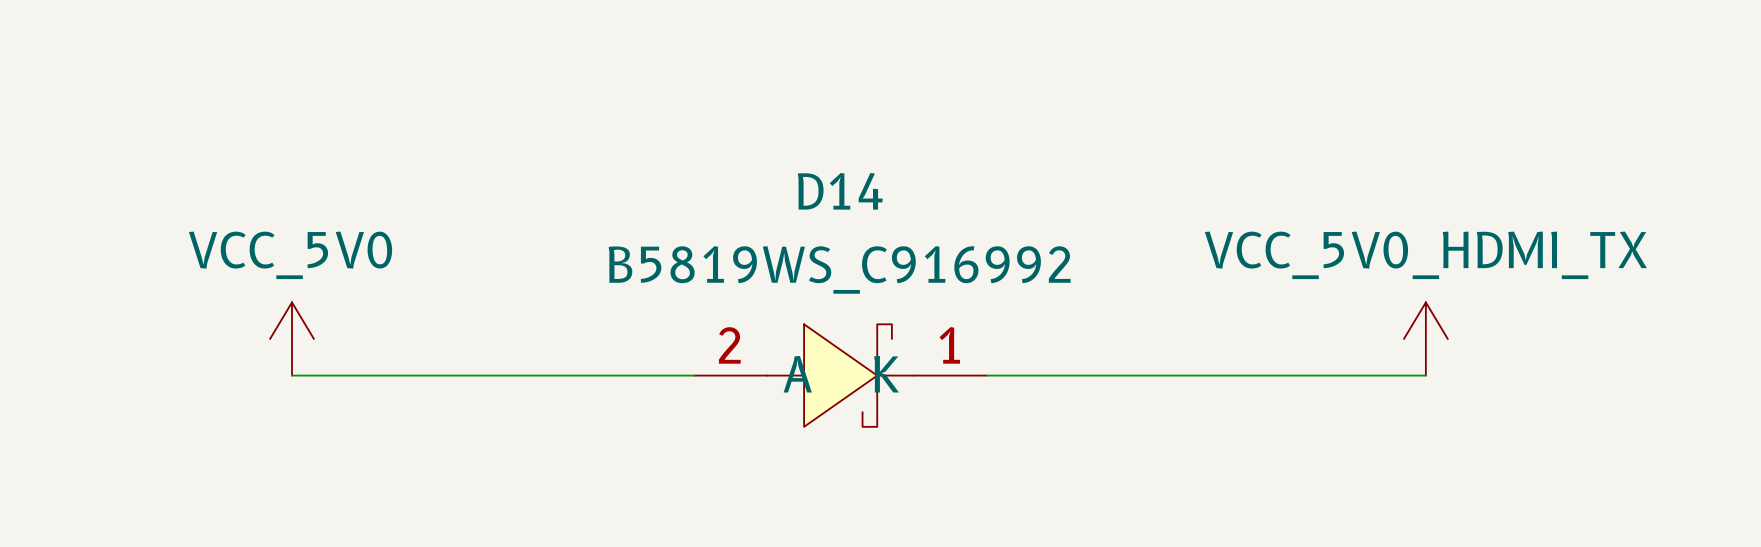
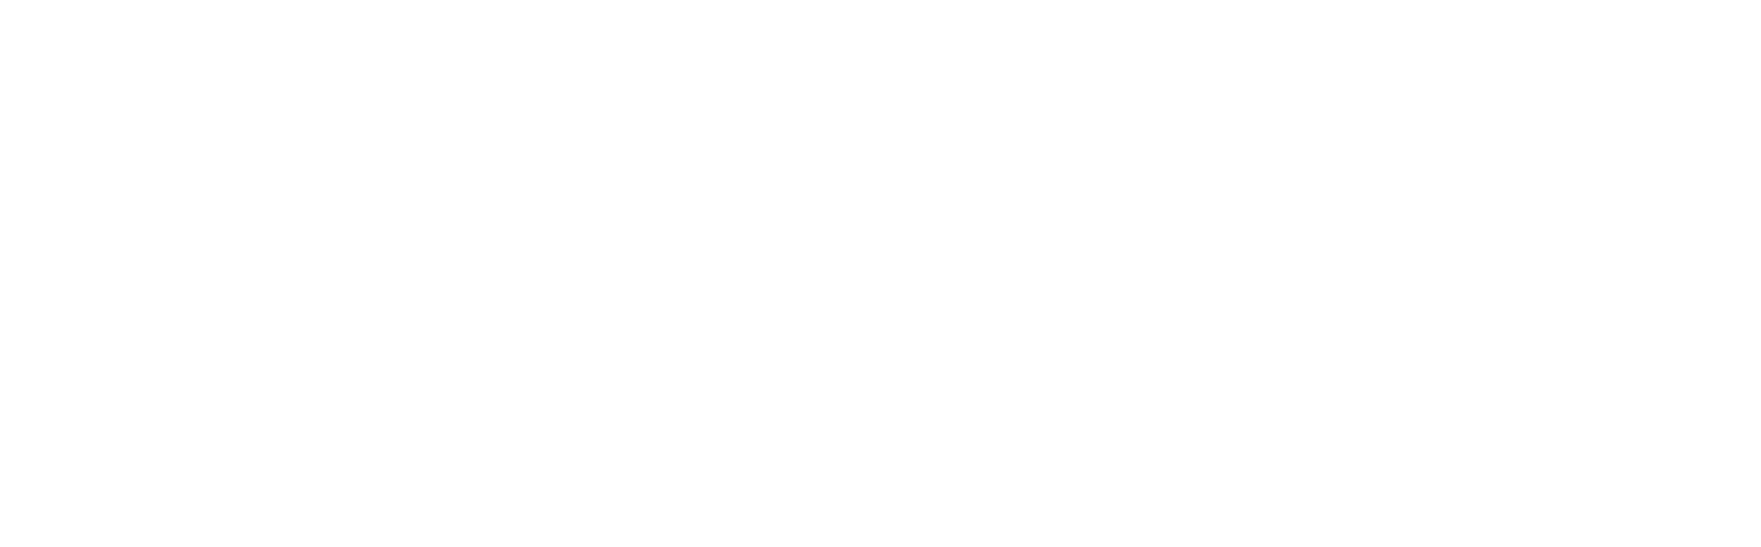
power symbol: VCC_5V0 (292, 339) -> none
power symbol: VCC_5V0_HDMI_TX (1425, 339) -> none
wire: (292, 375) (694, 375) -> none
D14: B5819WS_C916992 (840, 375) -> none
wire: (986, 375) (1425, 375) -> none

